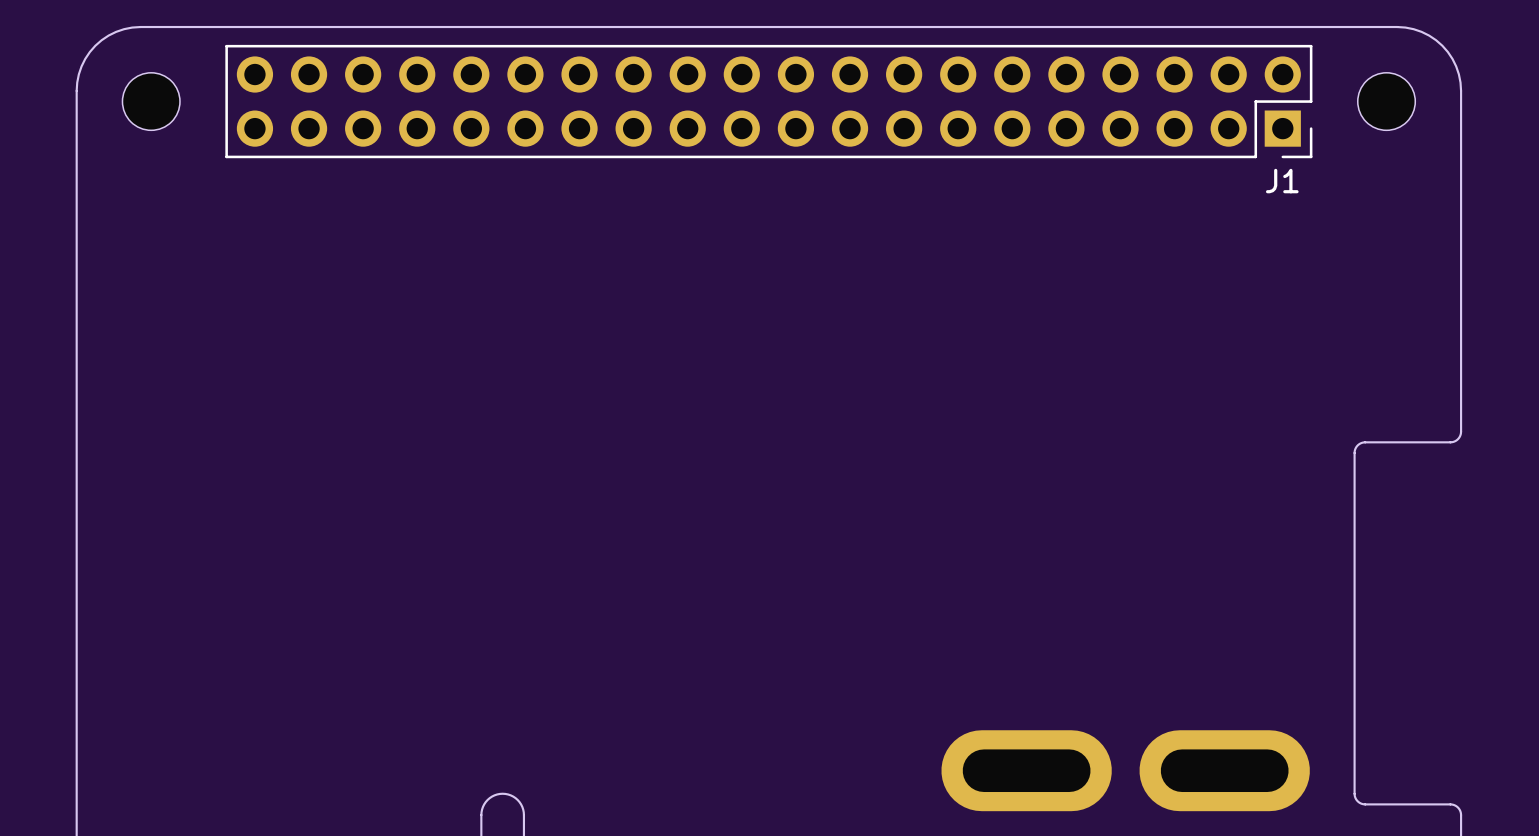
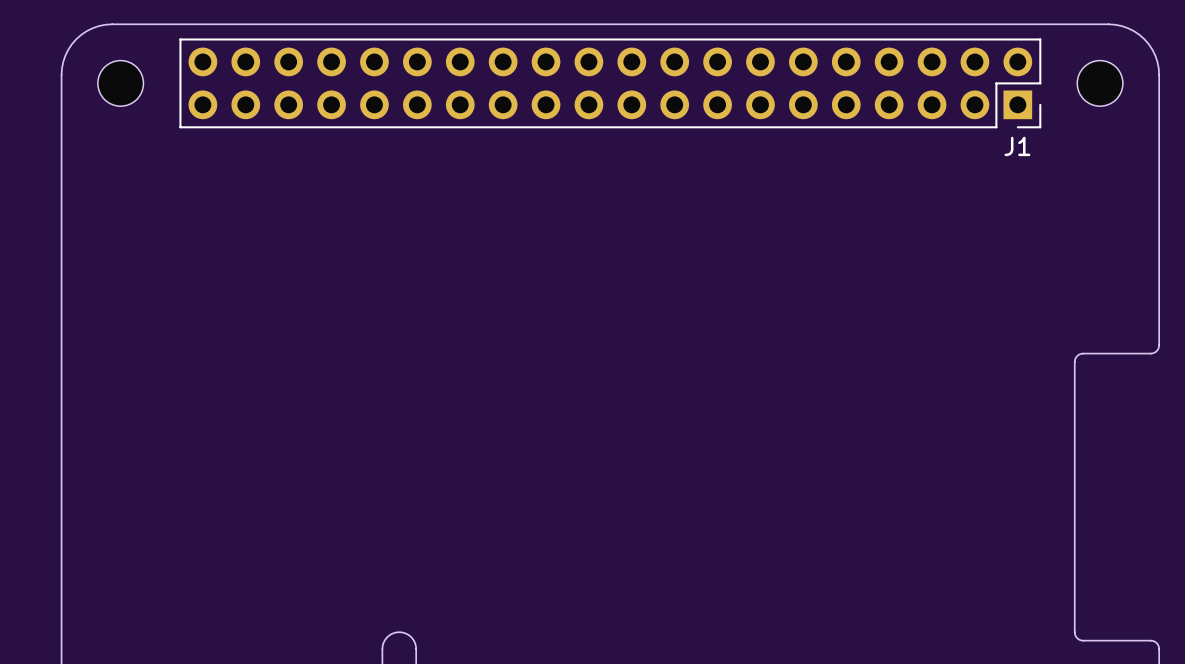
part: (1125, 770) -> none

